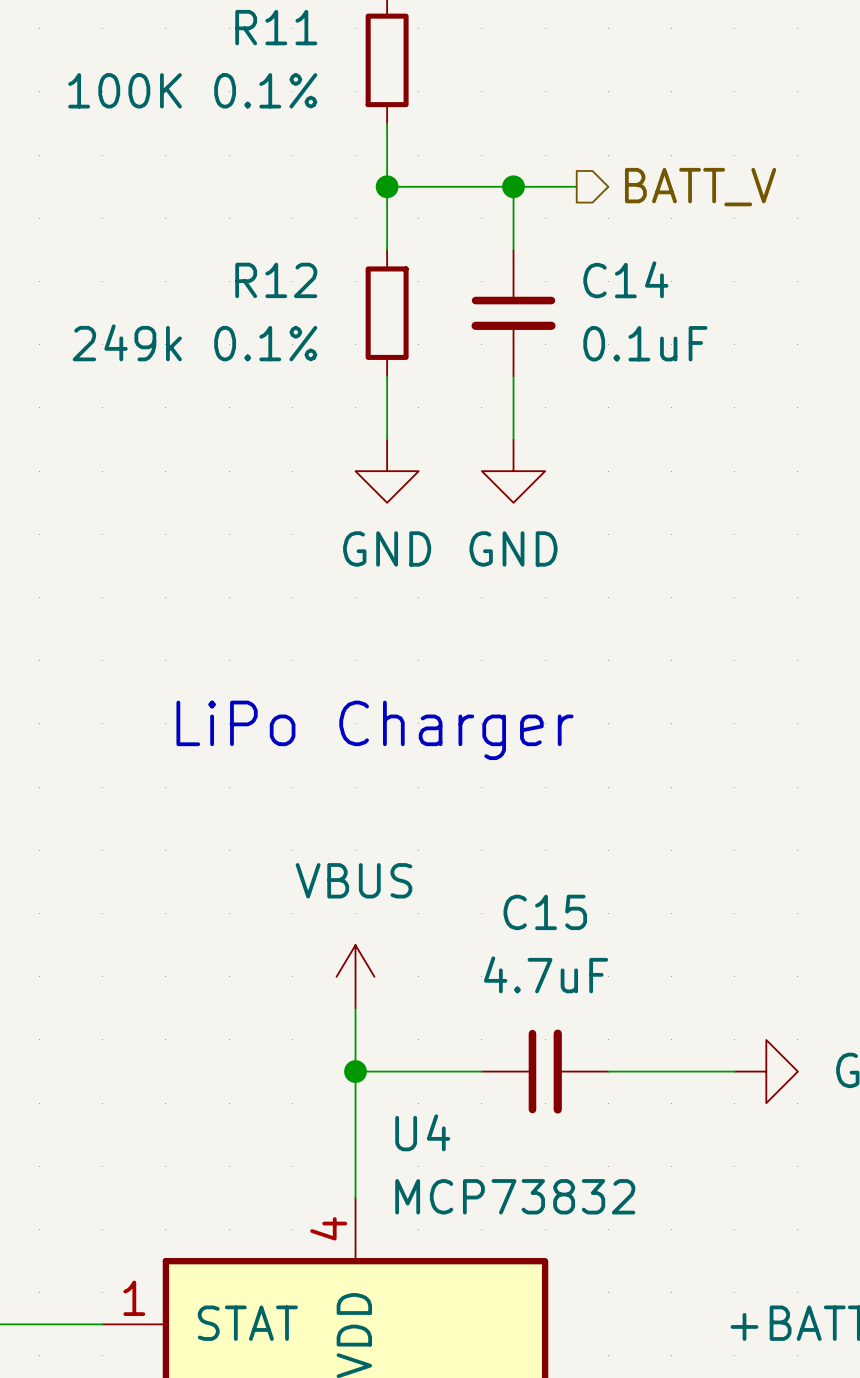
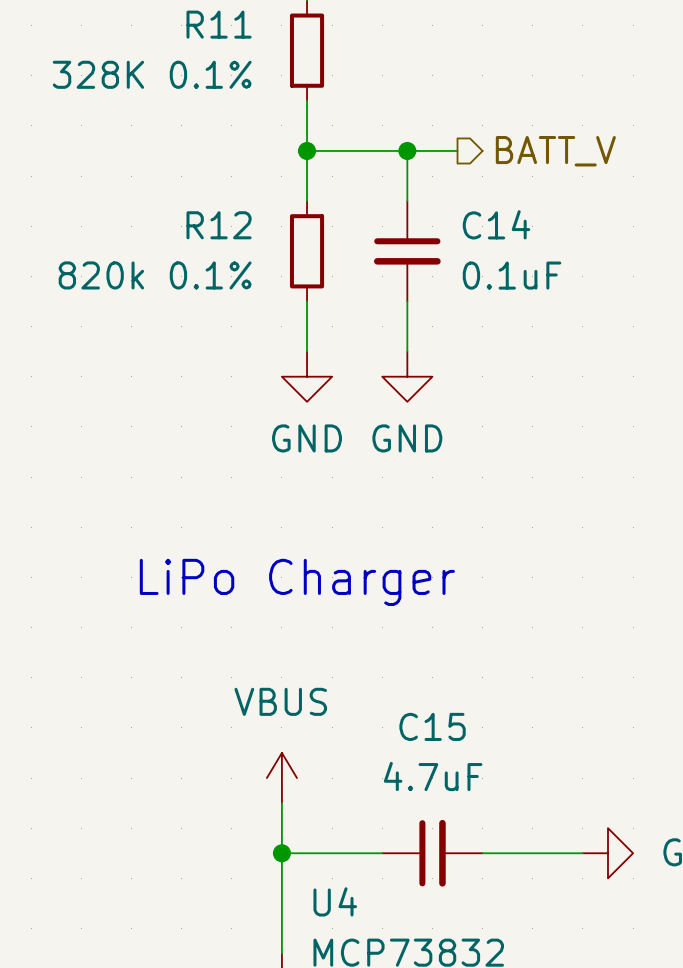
R11 value: 100K 0.1% (192, 90) -> 328K 0.1% (152, 74)
R12 value: 249k 0.1% (195, 342) -> 820k 0.1% (155, 275)

